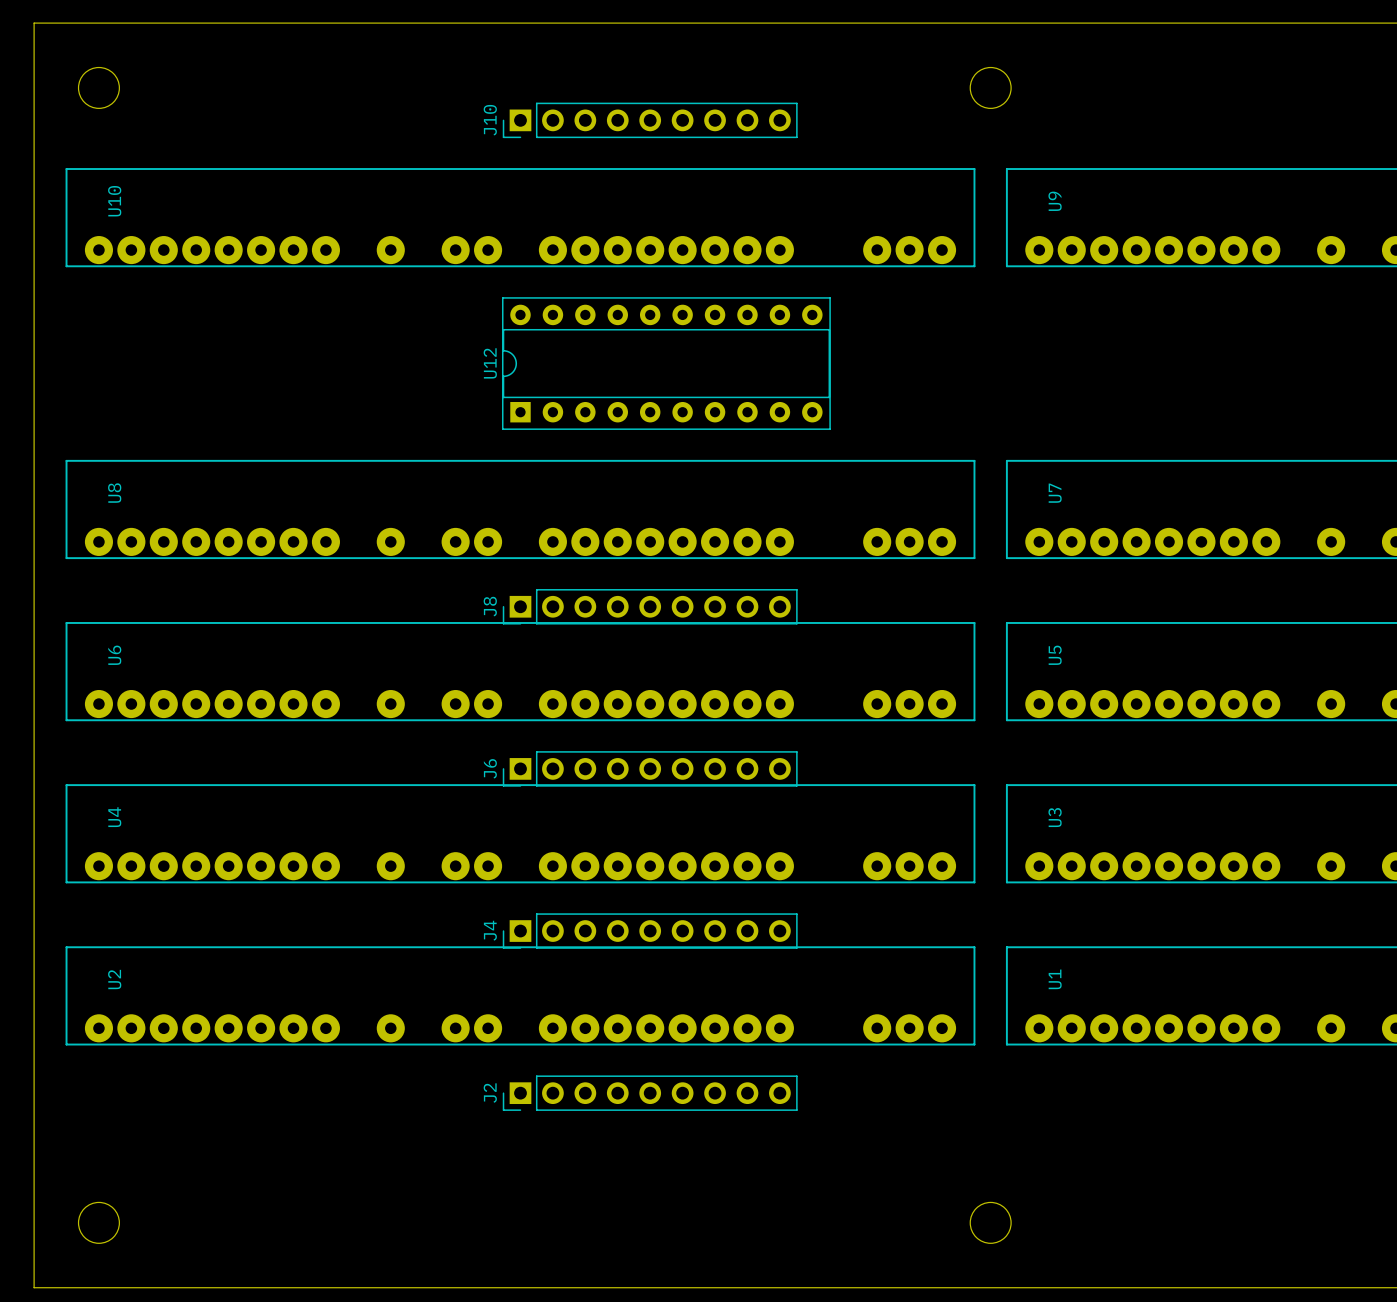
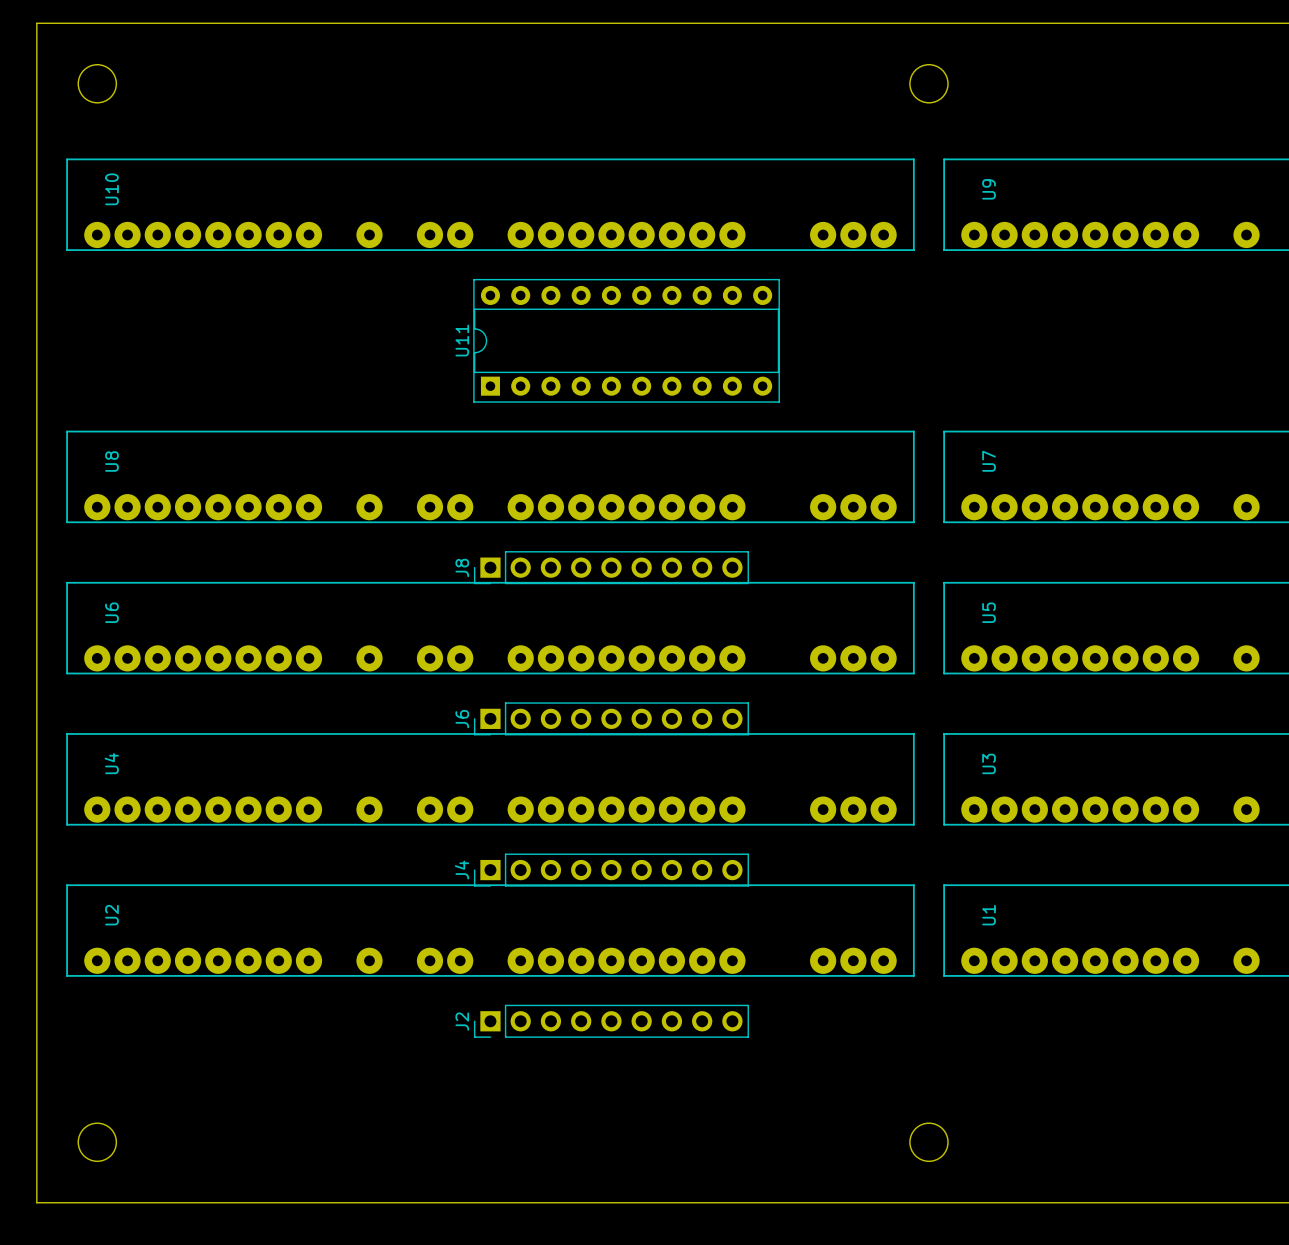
J10: (650, 120) -> none
U12 name: U12 (490, 363) -> U11 (462, 340)

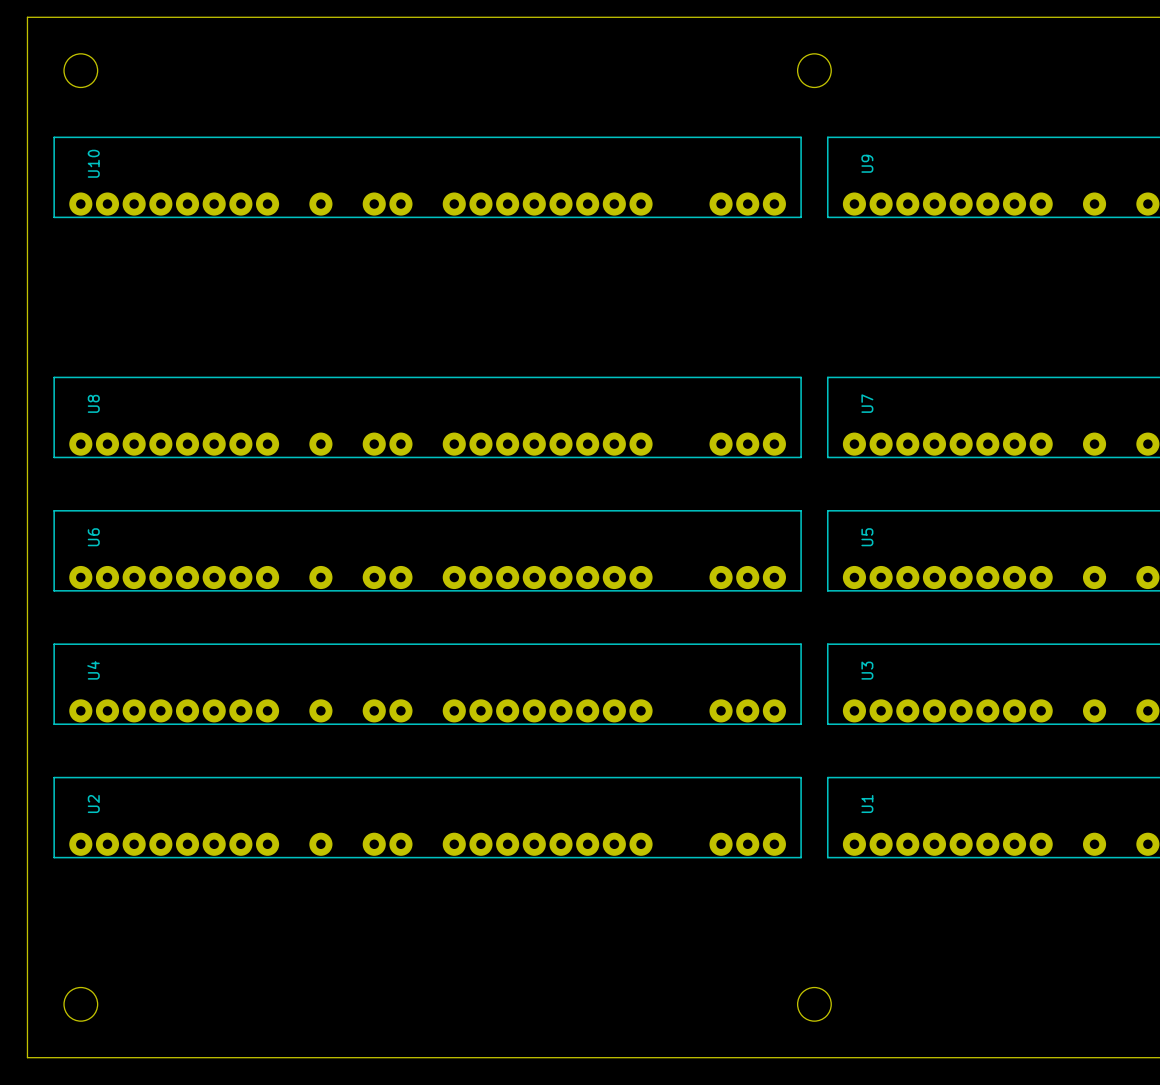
U11: (626, 340) -> none
J8: (611, 567) -> none
J6: (611, 718) -> none
J4: (611, 870) -> none
J2: (611, 1021) -> none

